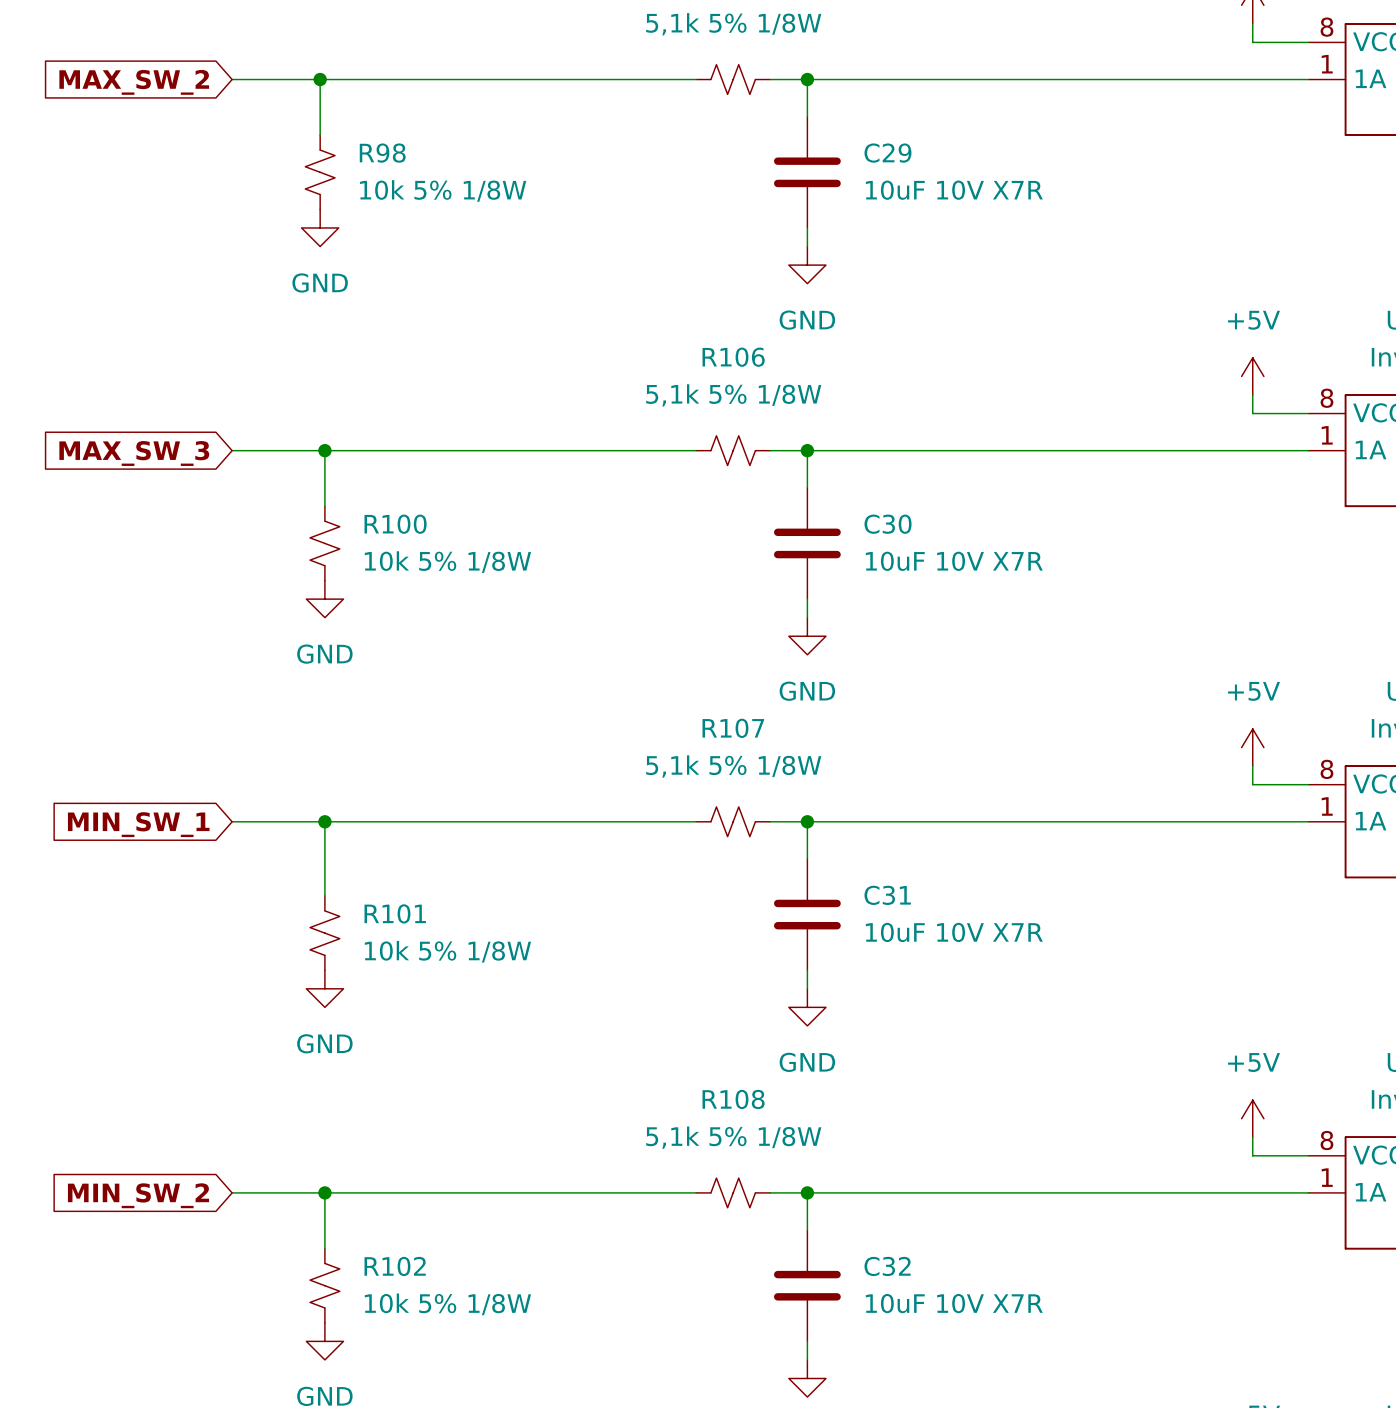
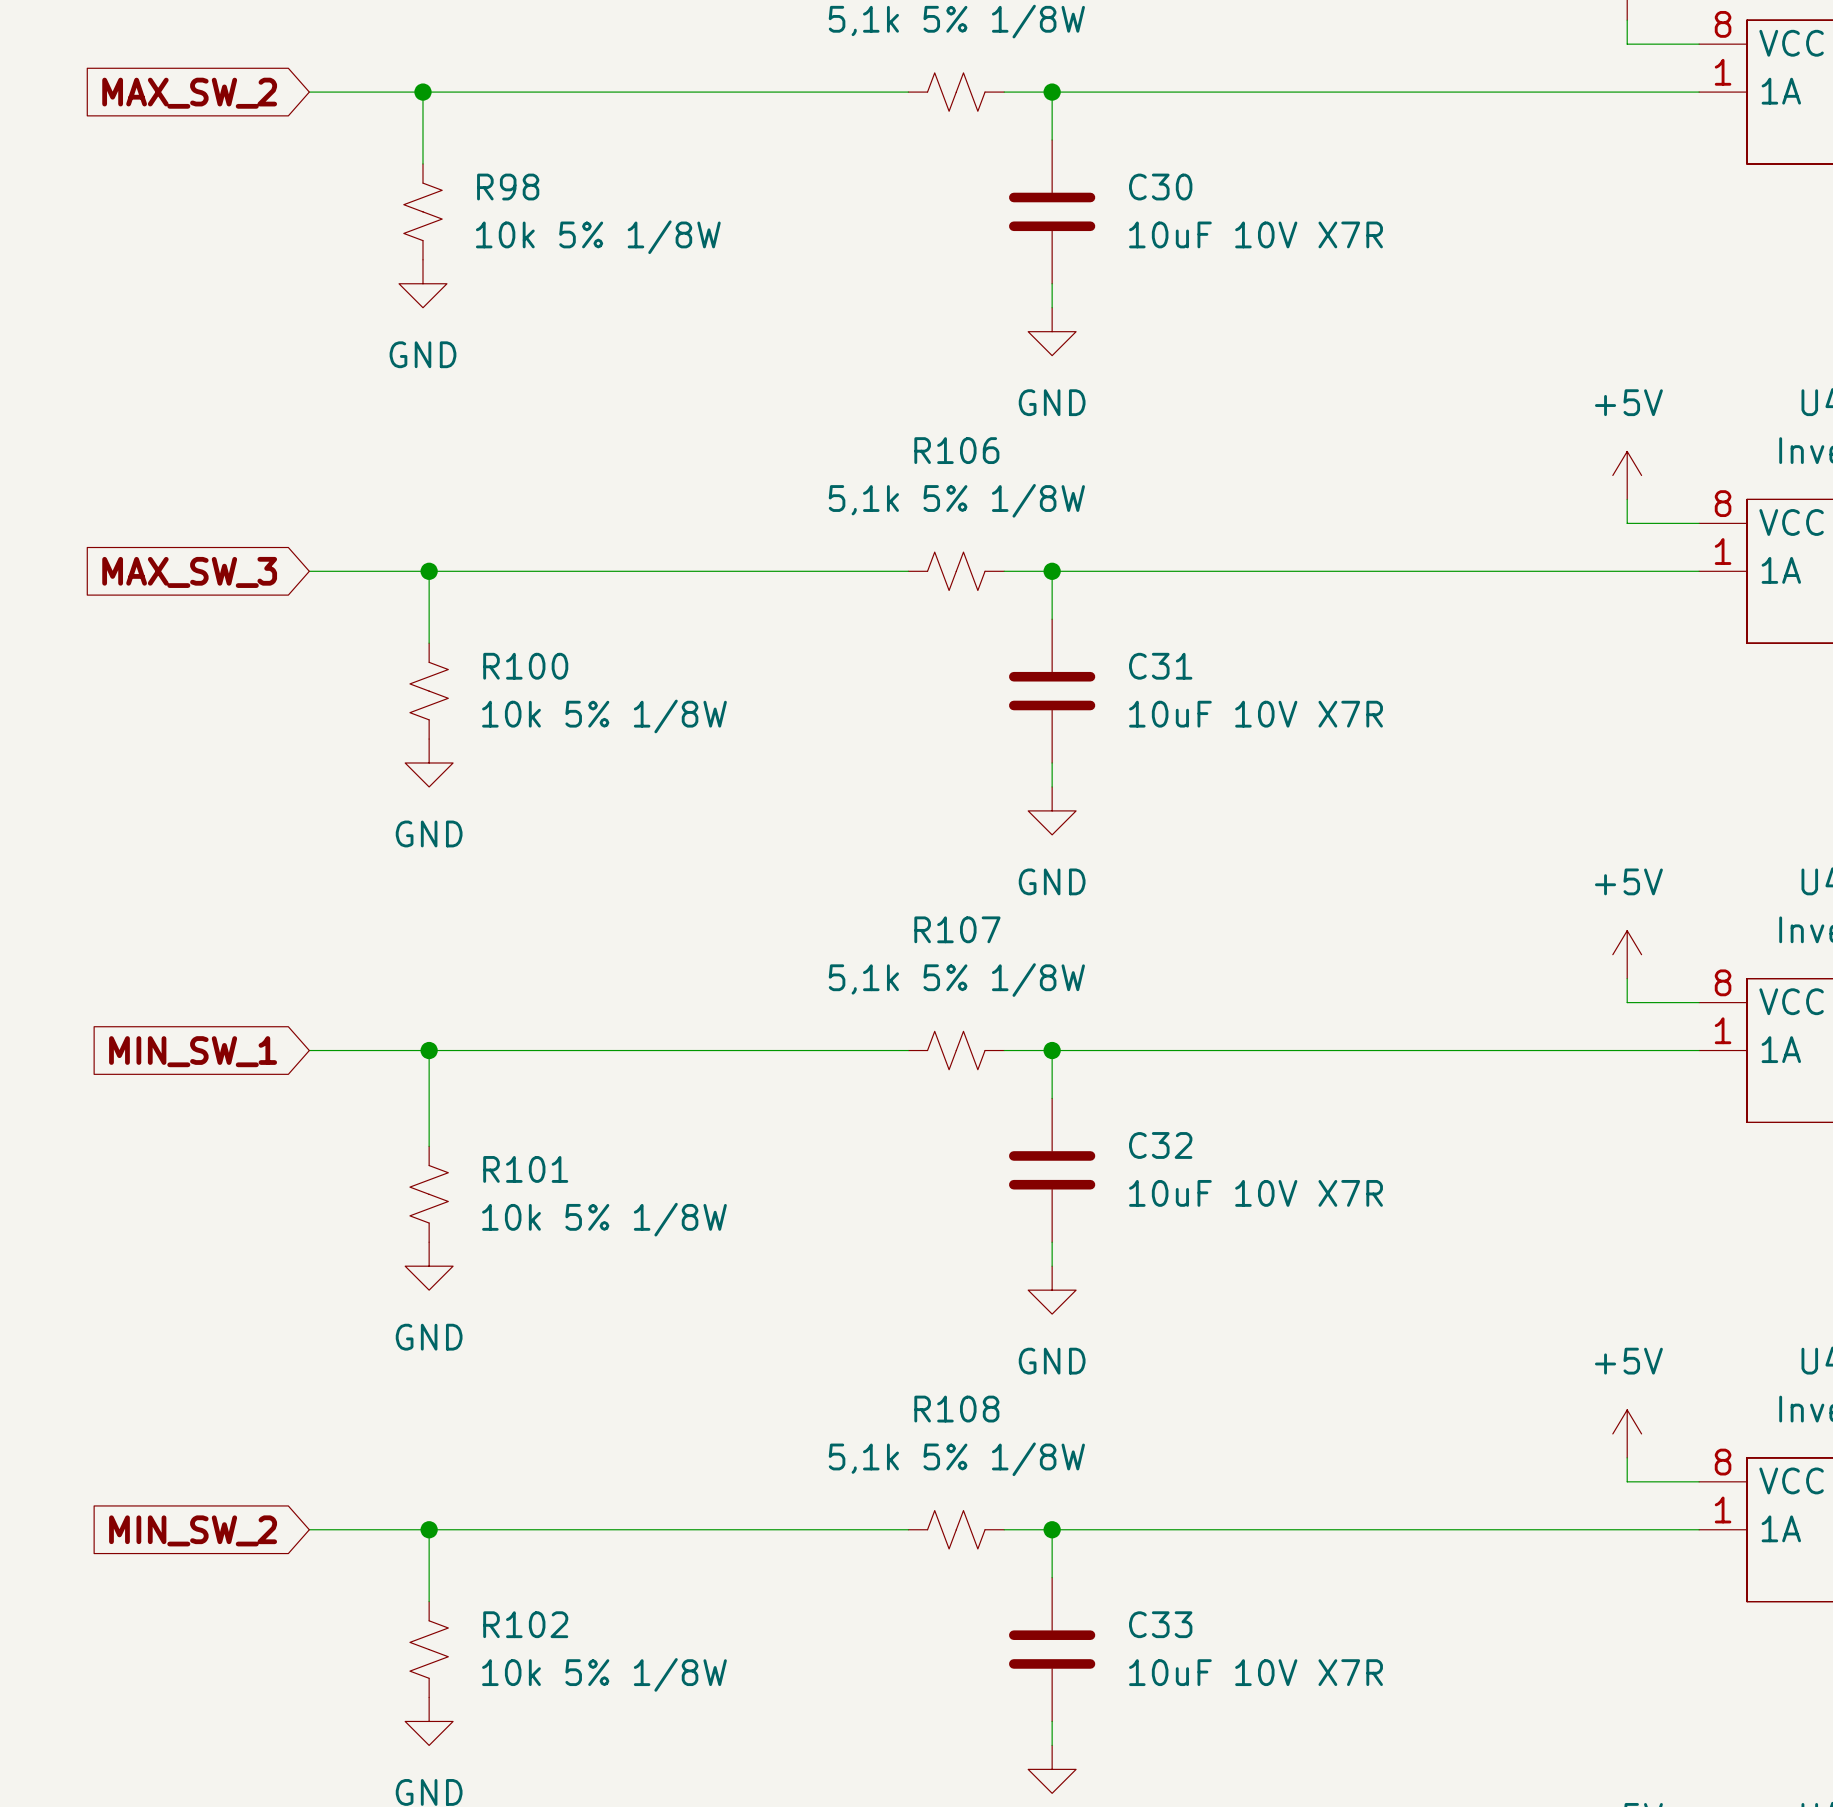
C29 name: C29 (887, 153) -> C30 (1160, 187)
C30 name: C30 (888, 524) -> C31 (1160, 666)
C31 name: C31 (887, 895) -> C32 (1160, 1145)
C32 name: C32 (887, 1266) -> C33 (1160, 1624)

